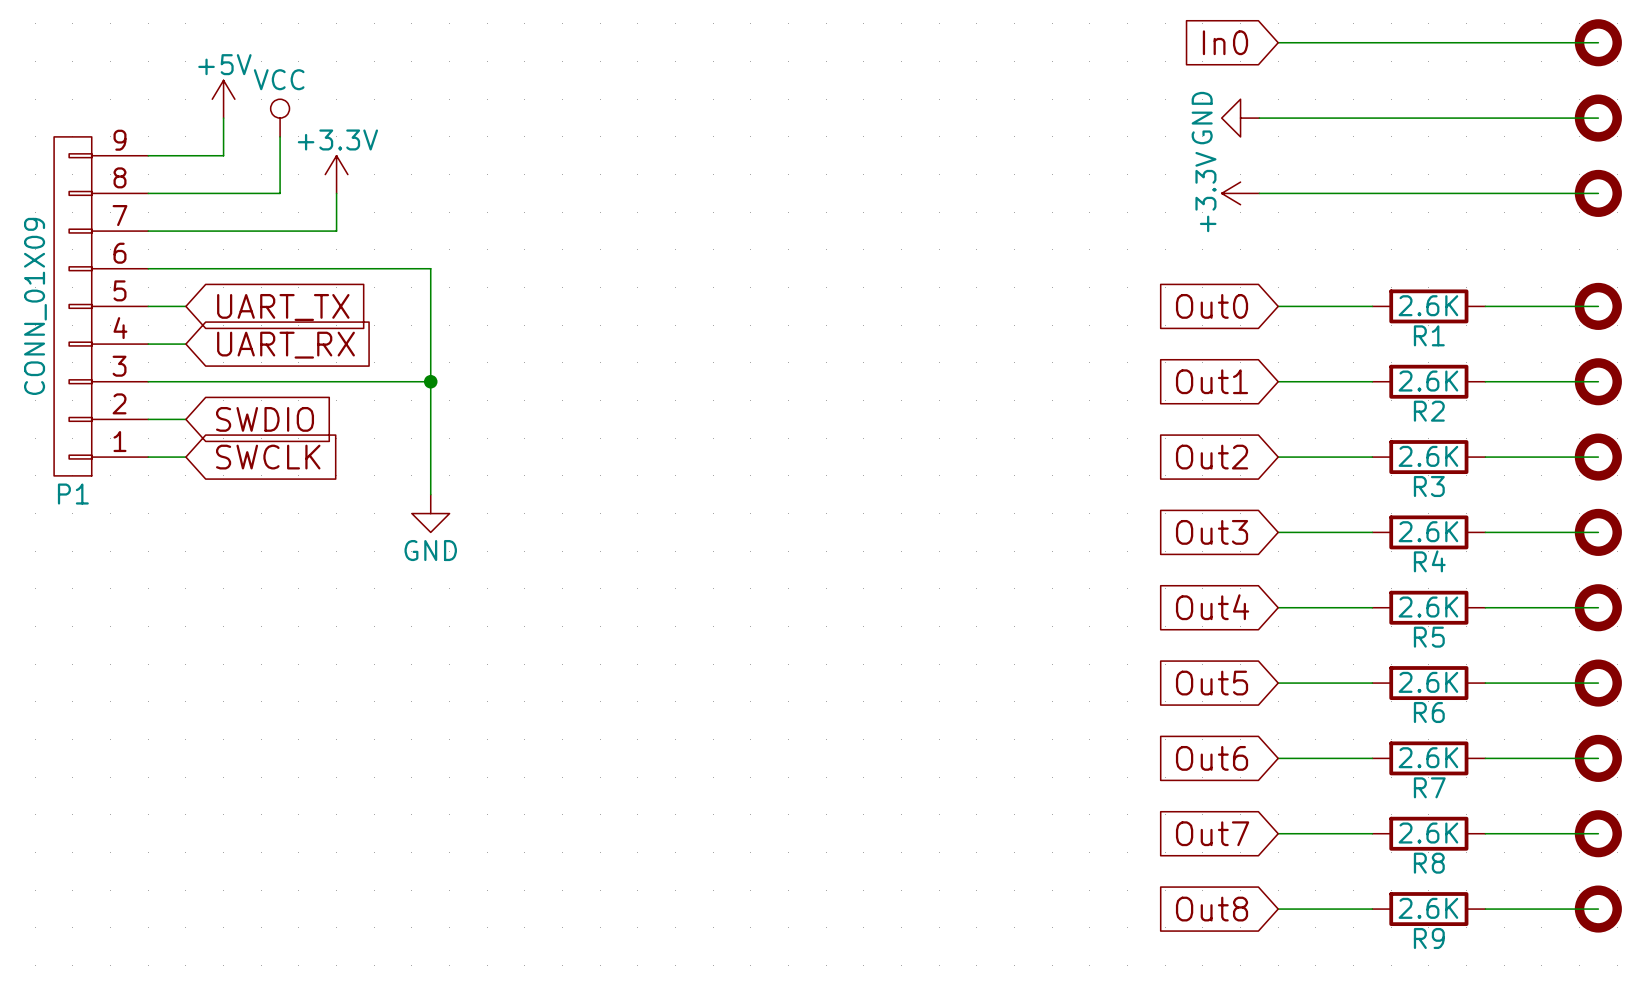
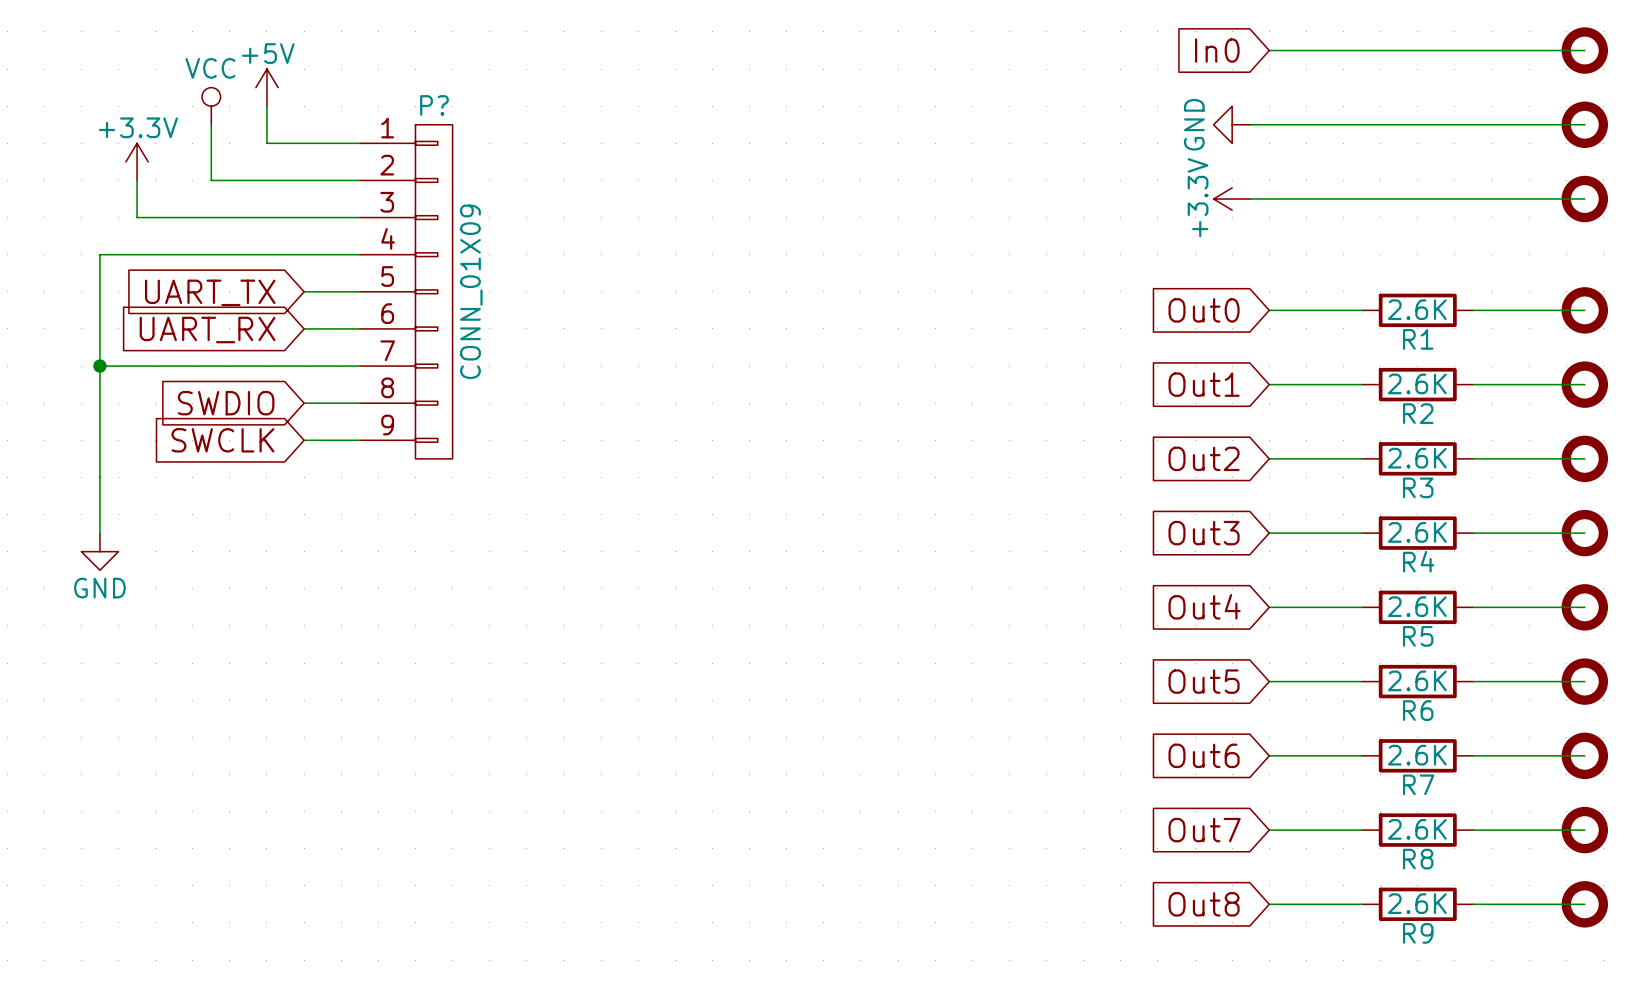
power symbol position: +5V (223, 99) -> +5V (266, 87)
wire: none -> (266, 106) (266, 143) (359, 143)
wire: none -> (211, 124) (211, 180) (359, 180)
wire: (223, 118) (223, 155) (148, 155) -> none
power symbol position: VCC (280, 118) -> VCC (211, 106)
wire: (280, 136) (280, 193) (148, 193) -> none
wire: none -> (137, 180) (137, 217) (359, 217)
power symbol position: +3.3V (336, 174) -> +3.3V (137, 161)
wire: (336, 193) (336, 231) (148, 231) -> none
wire: none -> (359, 254) (99, 254) (99, 533)
wire: (148, 268) (430, 268) (430, 494) -> none
wire: none -> (304, 291) (359, 291)
P?: none -> CONN_01X09 (406, 291)
P1: CONN_01X09 (101, 306) -> none
wire: (148, 306) (185, 306) -> none
global label rotation: 0° (283, 307) -> 180° (210, 292)
wire: none -> (304, 328) (359, 328)
wire: (148, 344) (185, 344) -> none
global label rotation: 0° (286, 345) -> 180° (207, 330)
wire: none -> (99, 366) (359, 366)
junction: none -> (99, 366)
wire: (148, 381) (430, 381) -> none
junction: (430, 381) -> none
wire: none -> (304, 403) (359, 403)
wire: (148, 419) (185, 419) -> none
global label rotation: 0° (265, 419) -> 180° (226, 403)
wire: none -> (304, 440) (359, 440)
wire: (148, 457) (185, 457) -> none
global label rotation: 0° (268, 457) -> 180° (222, 440)
power symbol position: GND (430, 513) -> GND (99, 551)

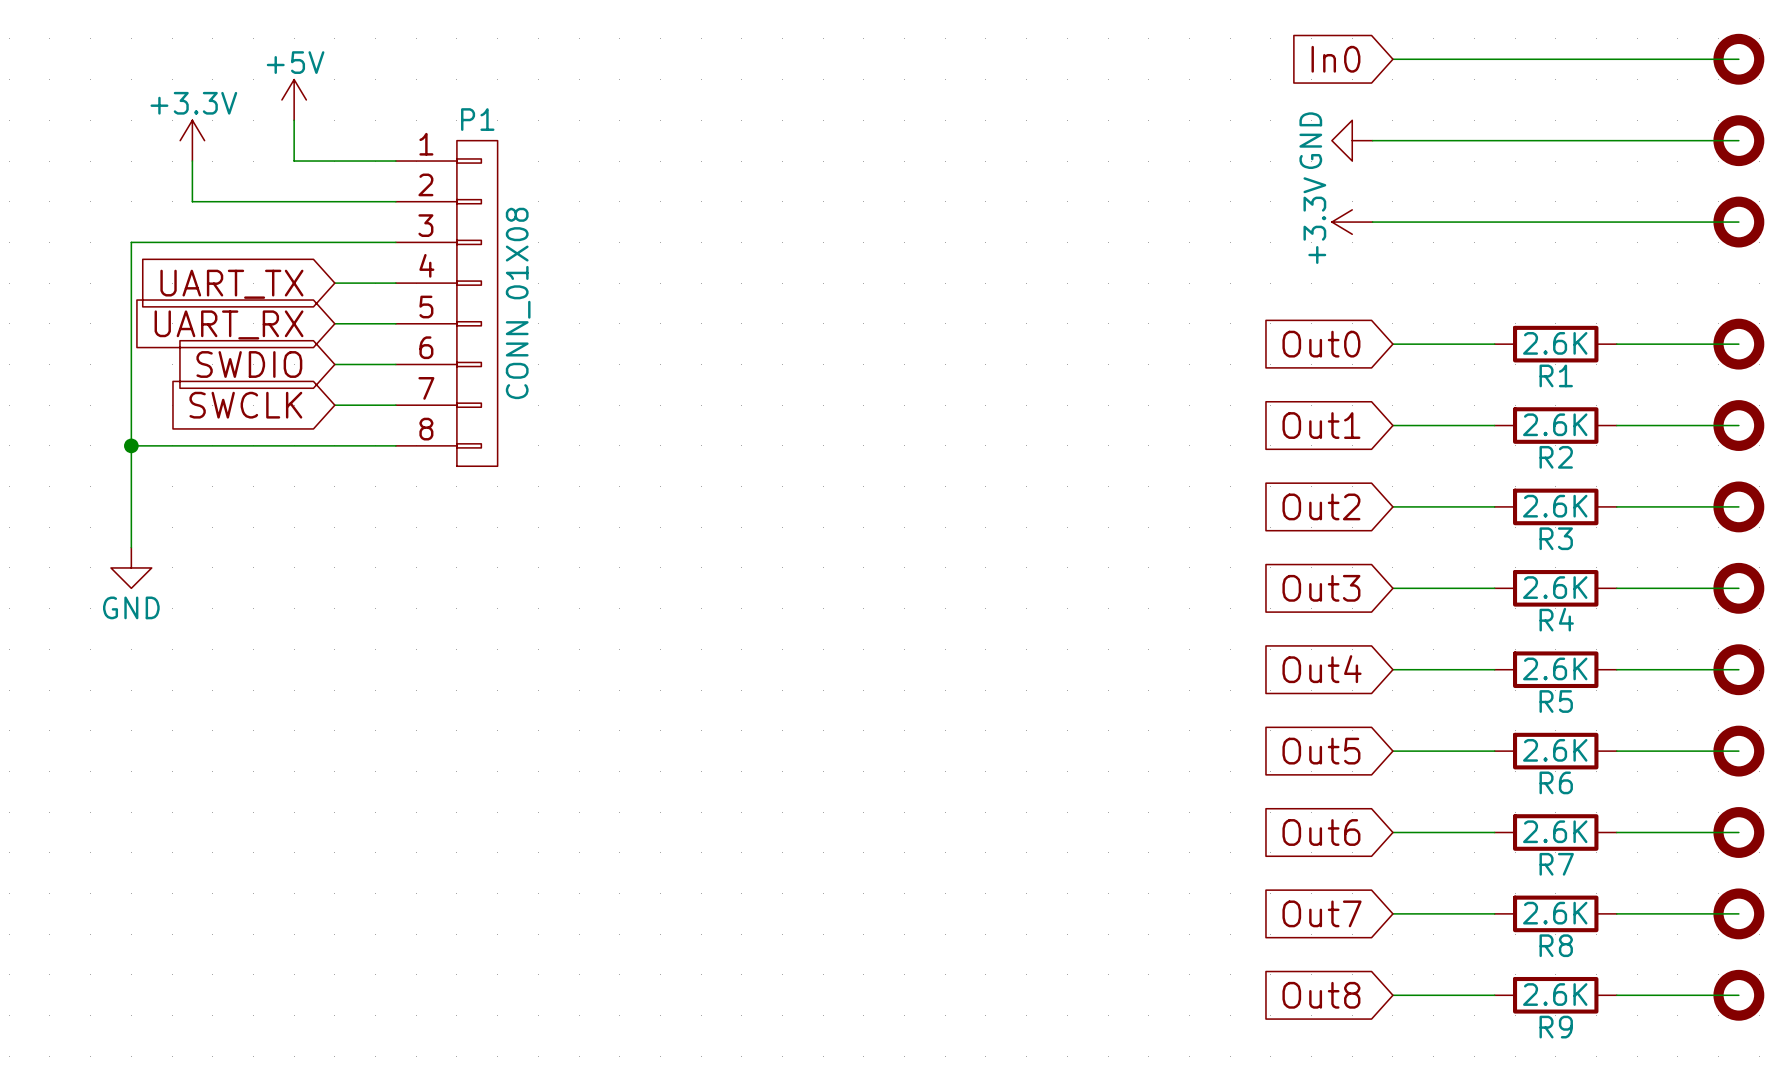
power symbol: VCC (211, 106) -> none
wire: (211, 124) (211, 180) -> (192, 161) (192, 201) (233, 201)
power symbol position: +3.3V (137, 161) -> +3.3V (192, 140)
wire: (137, 180) (137, 217) -> (131, 547) (131, 242) (151, 242)
wire: (304, 254) (99, 254) (99, 533) -> none
global label: none -> UART_TX (231, 284)
P1: none -> CONN_01X08 (446, 303)
P?: CONN_01X09 (406, 291) -> none
global label: UART_TX (210, 292) -> UART_RX (229, 324)
global label: UART_RX (207, 330) -> SWDIO (249, 364)
wire: (99, 366) (304, 366) -> none
junction position: (99, 366) -> (131, 445)
wire: none -> (131, 445) (334, 445)
global label: SWDIO (226, 403) -> none
global label position: SWCLK (222, 440) -> SWCLK (245, 405)
wire: (304, 440) (359, 440) -> none
power symbol position: GND (99, 551) -> GND (131, 567)

